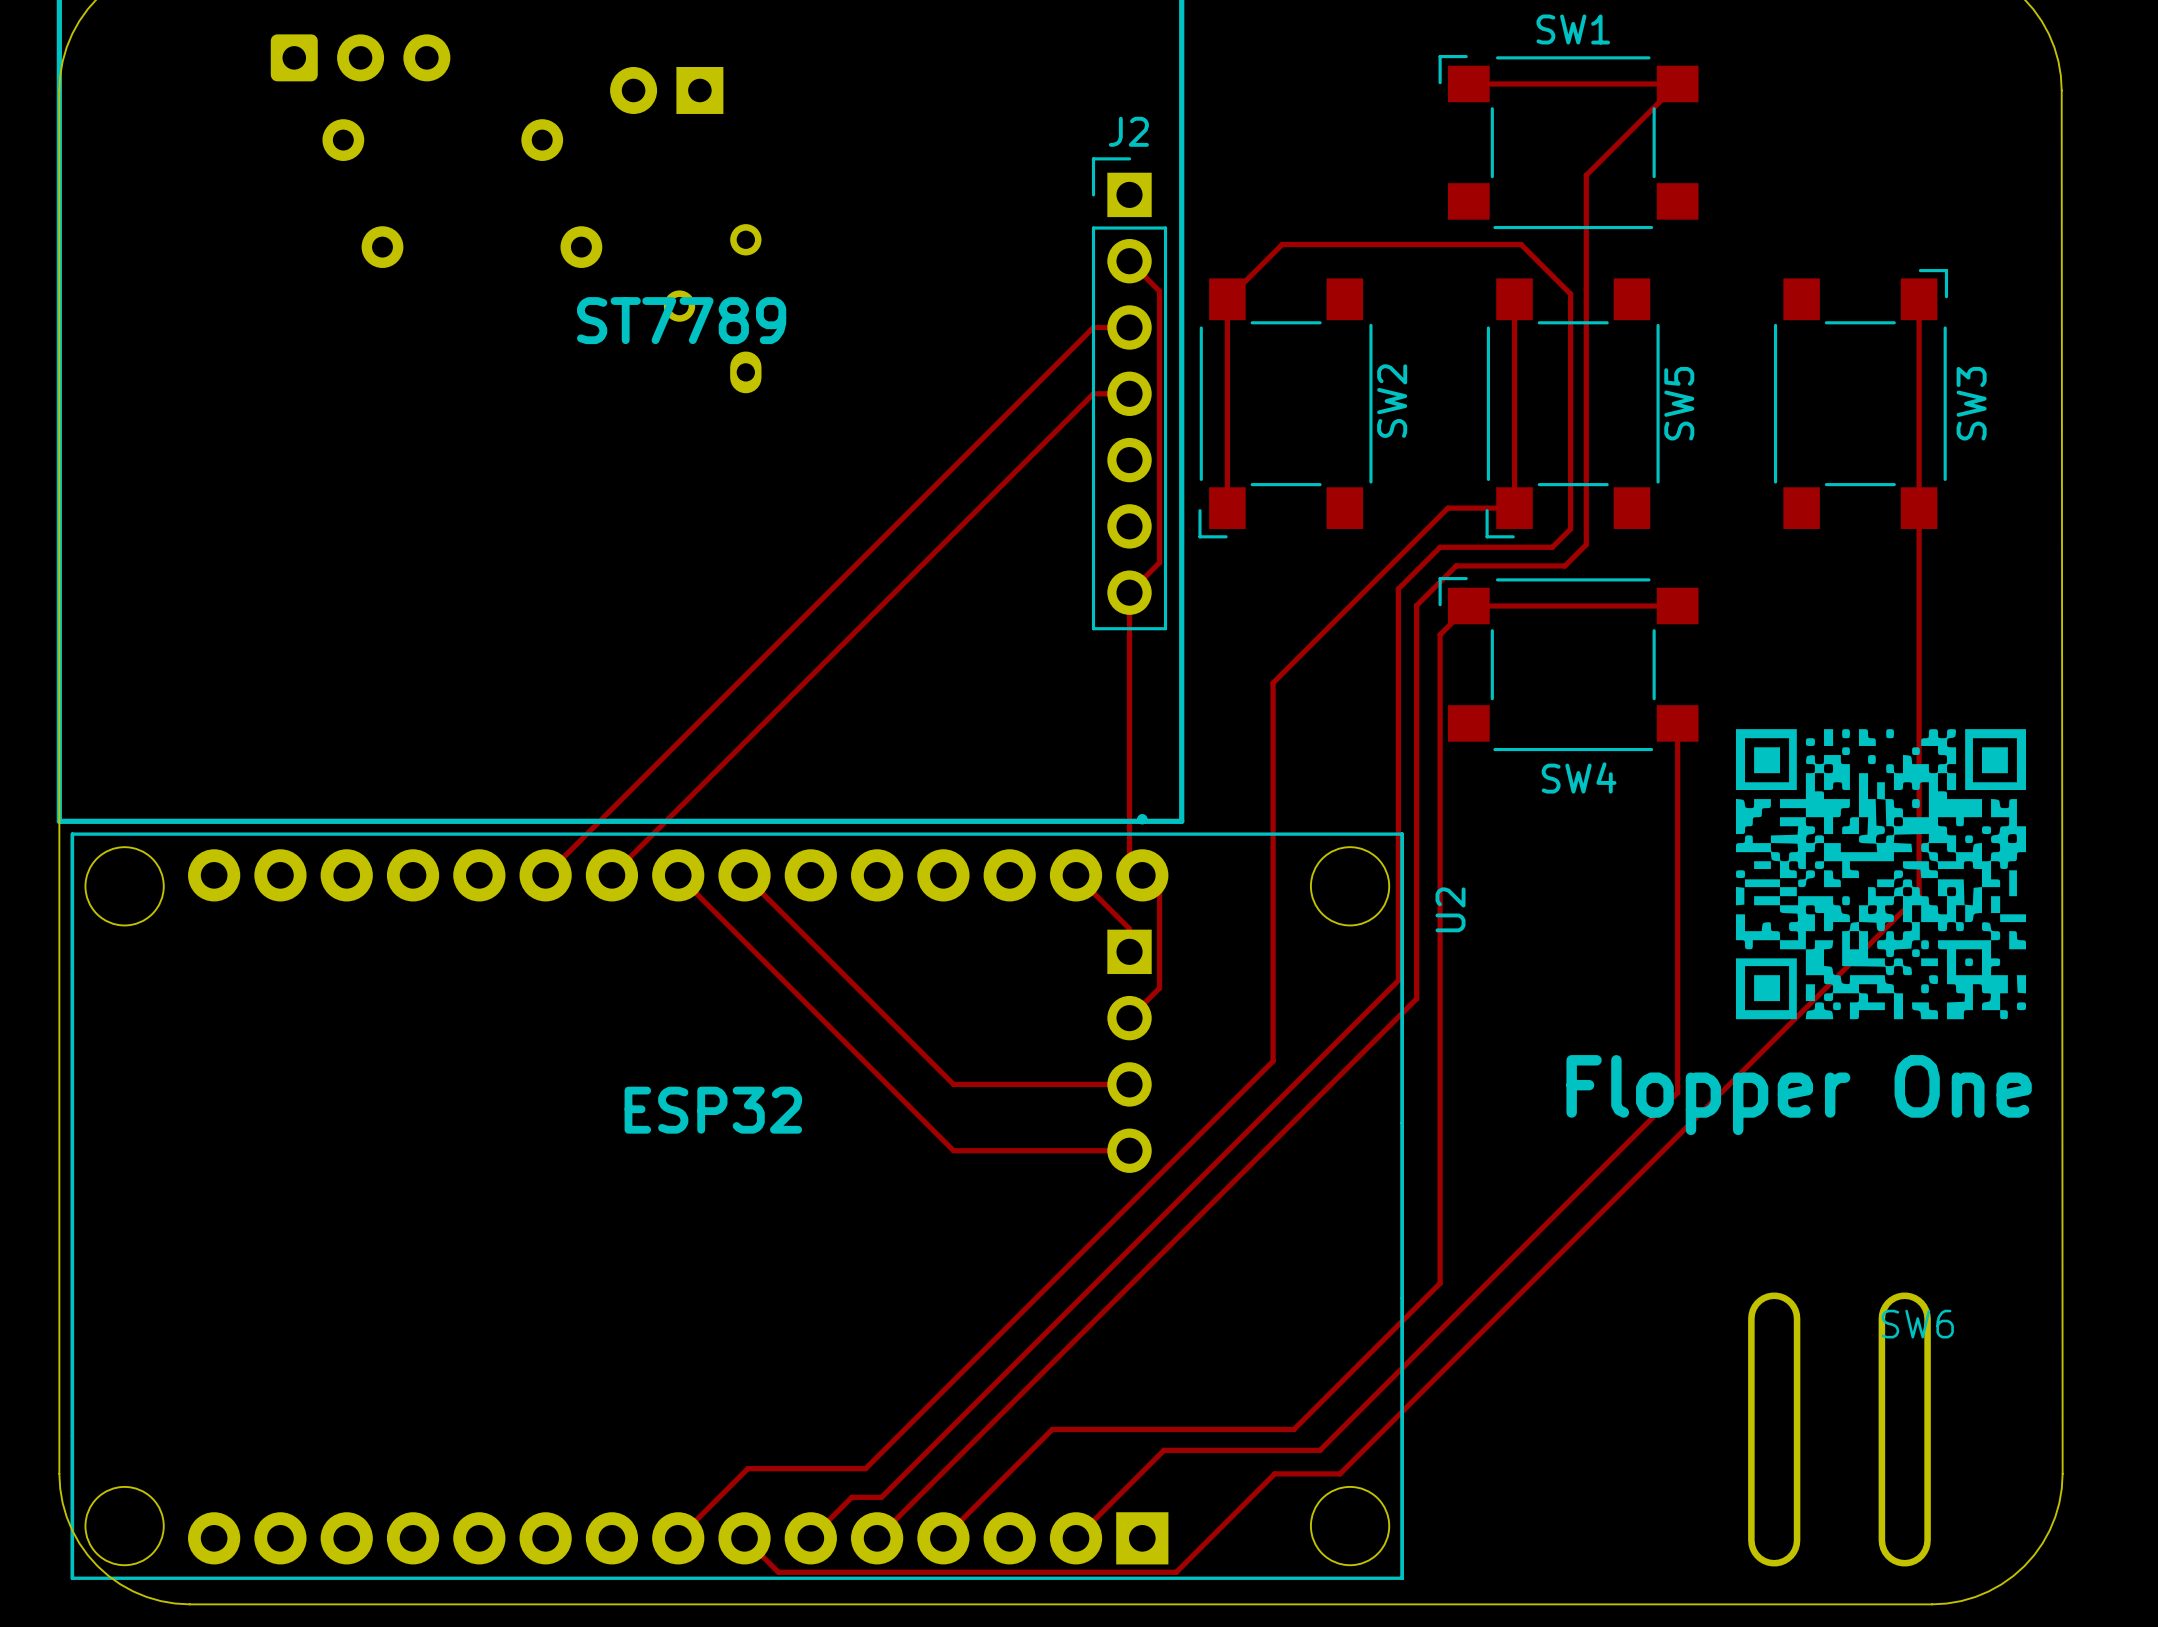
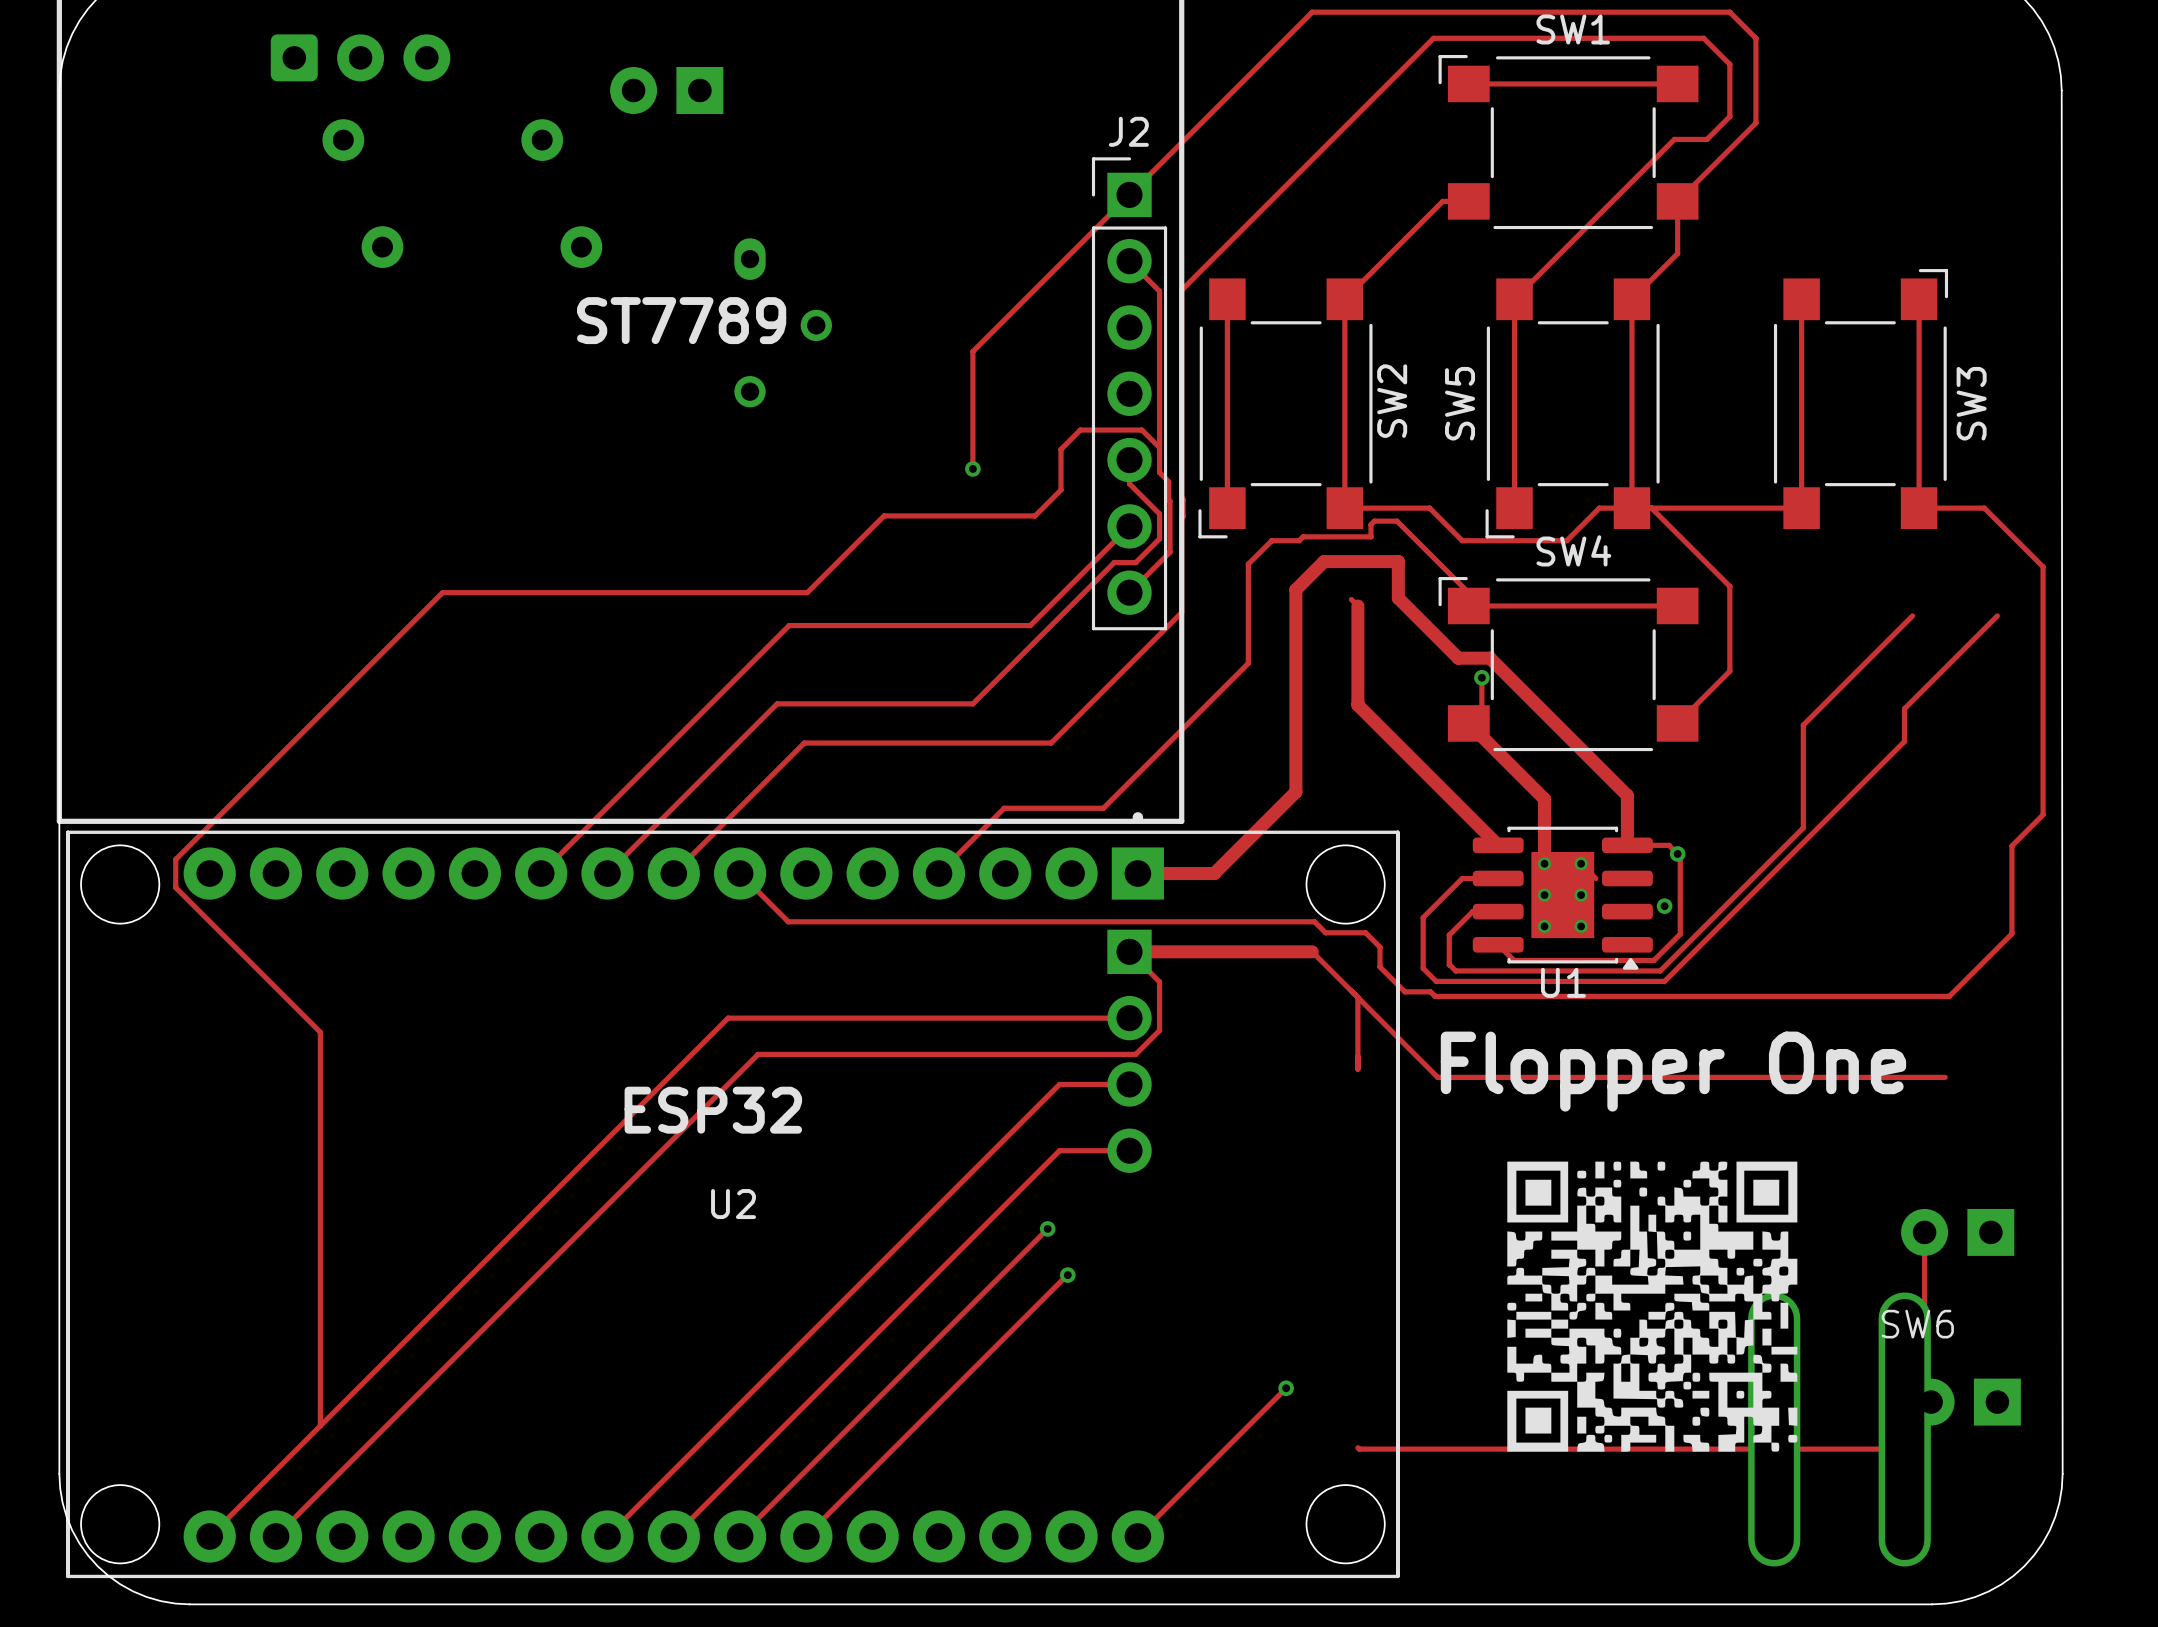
track: (1677, 83) (1586, 175) (1586, 544) (1565, 565) (1456, 565) (1416, 605) (1416, 998) (877, 1538) -> none
track: none -> (1468, 201) (1442, 201) (1344, 299) (1344, 508) (1429, 508) (1462, 540) (1566, 540) (1599, 508) (1801, 508) (1801, 299)
track: (1227, 299) (1282, 244) (1521, 244) (1570, 294) (1570, 528) (1552, 547) (1440, 547) (1398, 589) -> (1137, 873) (1214, 873) (1295, 791) (1295, 589) (1324, 561) (1398, 561) (1398, 589)
track: none -> (1514, 299) (1674, 139) (1707, 139) (1729, 116) (1729, 64) (1703, 38) (1433, 38) (1181, 290) (1181, 612) (1051, 743) (804, 743) (673, 873)
part rotation: 0° (712, 308) -> 180° (783, 322)
track: (1129, 327) (1093, 327) (545, 875) -> none
track: (1129, 393) (1093, 393) (611, 875) -> none
SW5 name position: SW5 (1679, 403) -> SW5 (1460, 403)
track: none -> (1159, 447) (1141, 430) (1080, 430) (1061, 449) (1061, 490) (1035, 515) (884, 515) (807, 592) (442, 592) (175, 859) (175, 887) (320, 1032) (320, 1425)
track: none -> (972, 468) (972, 351) (1312, 12) (1729, 12) (1755, 38) (1755, 123) (1677, 201) (1677, 253) (1631, 299) (1631, 508)
via: none -> (972, 468)
track: (1159, 472) (1159, 513) -> (1129, 460) (1129, 483) (1159, 513)
track: (1514, 508) (1447, 508) (1273, 682) (1273, 1061) (865, 1468) (747, 1468) (678, 1538) -> none
track: (1919, 508) (1919, 894) (1340, 1473) (1274, 1473) (1176, 1572) (778, 1572) (744, 1538) -> (1919, 508) (1984, 508) (2043, 566) (2043, 814) (2011, 845) (2011, 933) (1949, 996) (1435, 996) (1430, 991) (1404, 991) (1380, 967) (1380, 947) (1365, 932) (1325, 932) (1314, 921) (788, 921) (740, 873)
track: none -> (1129, 526) (1030, 625) (789, 625) (541, 873)
track: (1159, 538) (1159, 562) -> (1159, 472) (1168, 481) (1170, 501) (1170, 552) (1159, 562)
track: none -> (1159, 538) (1135, 562) (1114, 562) (972, 703) (777, 703) (607, 873)
track width: thin (1398, 589) (1398, 980) -> thick (1398, 589) (1398, 980)
track: (1129, 592) (1129, 862) (1159, 892) (1159, 981) -> (1945, 1077) (1437, 1077) (1312, 951) (1129, 951) (1159, 981)
track: (1398, 598) (1398, 980) (881, 1497) (851, 1497) (810, 1538) -> (1398, 598) (1458, 658) (1490, 658) (1627, 795) (1627, 845)
track: none -> (1351, 599) (1357, 605) (1357, 705) (1498, 845)
track: (1468, 605) (1440, 634) (1440, 1283) (1293, 1429) (1052, 1429) (943, 1538) -> (1468, 605) (1468, 592) (1397, 521) (1374, 521) (1370, 524) (1370, 536) (1303, 536) (1299, 540) (1271, 540) (1248, 564) (1248, 663) (1103, 808) (1004, 808) (938, 873)
track: none -> (1912, 615) (1803, 725) (1803, 827) (1660, 970) (1455, 970) (1449, 964)
track: none -> (1997, 615) (1904, 708) (1904, 741) (1664, 981) (1436, 981) (1423, 968) (1423, 917) (1462, 878) (1498, 878)
track: none -> (1481, 677) (1481, 710) (1468, 723) (1544, 799) (1544, 863) (1581, 863) (1595, 878)
via: none -> (1481, 677)
track: (1677, 723) (1677, 1092) (1320, 1450) (1163, 1450) (1076, 1538) -> (1677, 723) (1729, 671) (1729, 586) (1651, 508)
drawing: [1754, 729, 1920, 774] -> none
drawing: [1981, 747, 2008, 774] -> none
drawing position: (1766, 759) -> (1537, 1192)
drawing position: (1995, 759) -> (1766, 1192)
SW4 name position: SW4 (1579, 777) -> SW4 (1573, 550)
drawing: [1912, 799, 1920, 809] -> none
U2 footprint: [70, 814, 1404, 1580] -> [66, 812, 1400, 1579]
drawing position: (1753, 816) -> (1524, 1248)
drawing position: (1792, 816) -> (1564, 1249)
drawing: [1965, 826, 1992, 844] -> none
track: none -> (1627, 845) (1669, 845) (1680, 856) (1680, 934) (1653, 960) (1513, 960) (1498, 944)
drawing position: (1920, 852) -> (1691, 1284)
via: none -> (1677, 853)
drawing: [1735, 861, 1771, 879] -> none
drawing position: (1920, 869) -> (1691, 1302)
drawing: [1824, 870, 1850, 906] -> none
track: (678, 875) (953, 1150) (1059, 1150) -> (673, 1536) (1059, 1150)
track: (744, 875) (953, 1084) (1059, 1084) -> (607, 1536) (1059, 1084)
track: (1076, 875) (1129, 928) (1129, 951) -> none
drawing position: (1806, 878) -> (1577, 1311)
drawing position: (1890, 878) -> (1661, 1311)
drawing position: (1762, 883) -> (1533, 1315)
drawing position: (2013, 883) -> (1784, 1315)
drawing position: (1740, 896) -> (1511, 1328)
drawing: [1991, 896, 2001, 914] -> none
U1: none -> (1562, 898)
via: none -> (1664, 906)
U2 name rotation: 0° (1450, 909) -> 90° clockwise (733, 1204)
U2 name position: U2 (1450, 909) -> U2 (733, 1204)
track: none -> (1498, 911) (1472, 911) (1449, 935) (1449, 964)
drawing position: (2013, 918) -> (1784, 1350)
drawing: [1912, 940, 1973, 994] -> none
drawing position: (2017, 940) -> (1788, 1372)
drawing position: (1819, 953) -> (1590, 1385)
drawing position: (1972, 970) -> (1744, 1403)
drawing: [1754, 975, 1841, 1011] -> none
drawing position: (1933, 979) -> (1704, 1412)
drawing position: (2021, 984) -> (1792, 1416)
track: (1159, 988) (1129, 1018) -> (1159, 988) (1159, 1030) (1135, 1054) (758, 1054) (276, 1536)
drawing position: (1766, 988) -> (1537, 1421)
track: none -> (1357, 997) (1357, 1069)
drawing: [2016, 1002, 2027, 1011] -> none
drawing position: (1819, 1010) -> (1590, 1443)
drawing position: (1925, 1010) -> (1696, 1443)
drawing position: (2004, 1014) -> (1775, 1447)
track: none -> (1129, 1018) (728, 1018) (209, 1536)
text position: Flopper One (1799, 1095) -> Flopper One (1673, 1071)
drawing: none -> [1525, 1161, 1692, 1206]
drawing: none -> [1753, 1179, 1780, 1206]
track: none -> (1047, 1228) (740, 1536)
via: none -> (1047, 1228)
drawing: none -> [1683, 1231, 1692, 1241]
track: none -> (1924, 1232) (1924, 1395) (1931, 1402) (1931, 1421) (1903, 1449) (1357, 1447)
part: none -> (1957, 1232)
drawing: none -> [1736, 1258, 1763, 1276]
track: none -> (1067, 1275) (806, 1536)
via: none -> (1067, 1275)
drawing: none -> [1507, 1293, 1543, 1311]
drawing: none -> [1595, 1302, 1622, 1338]
drawing: none -> [1762, 1328, 1772, 1346]
drawing: none -> [1683, 1372, 1745, 1426]
track: none -> (1286, 1388) (1137, 1536)
via: none -> (1286, 1388)
part: none -> (1964, 1402)
drawing: none -> [1525, 1407, 1613, 1443]
drawing: none -> [1788, 1434, 1798, 1443]

